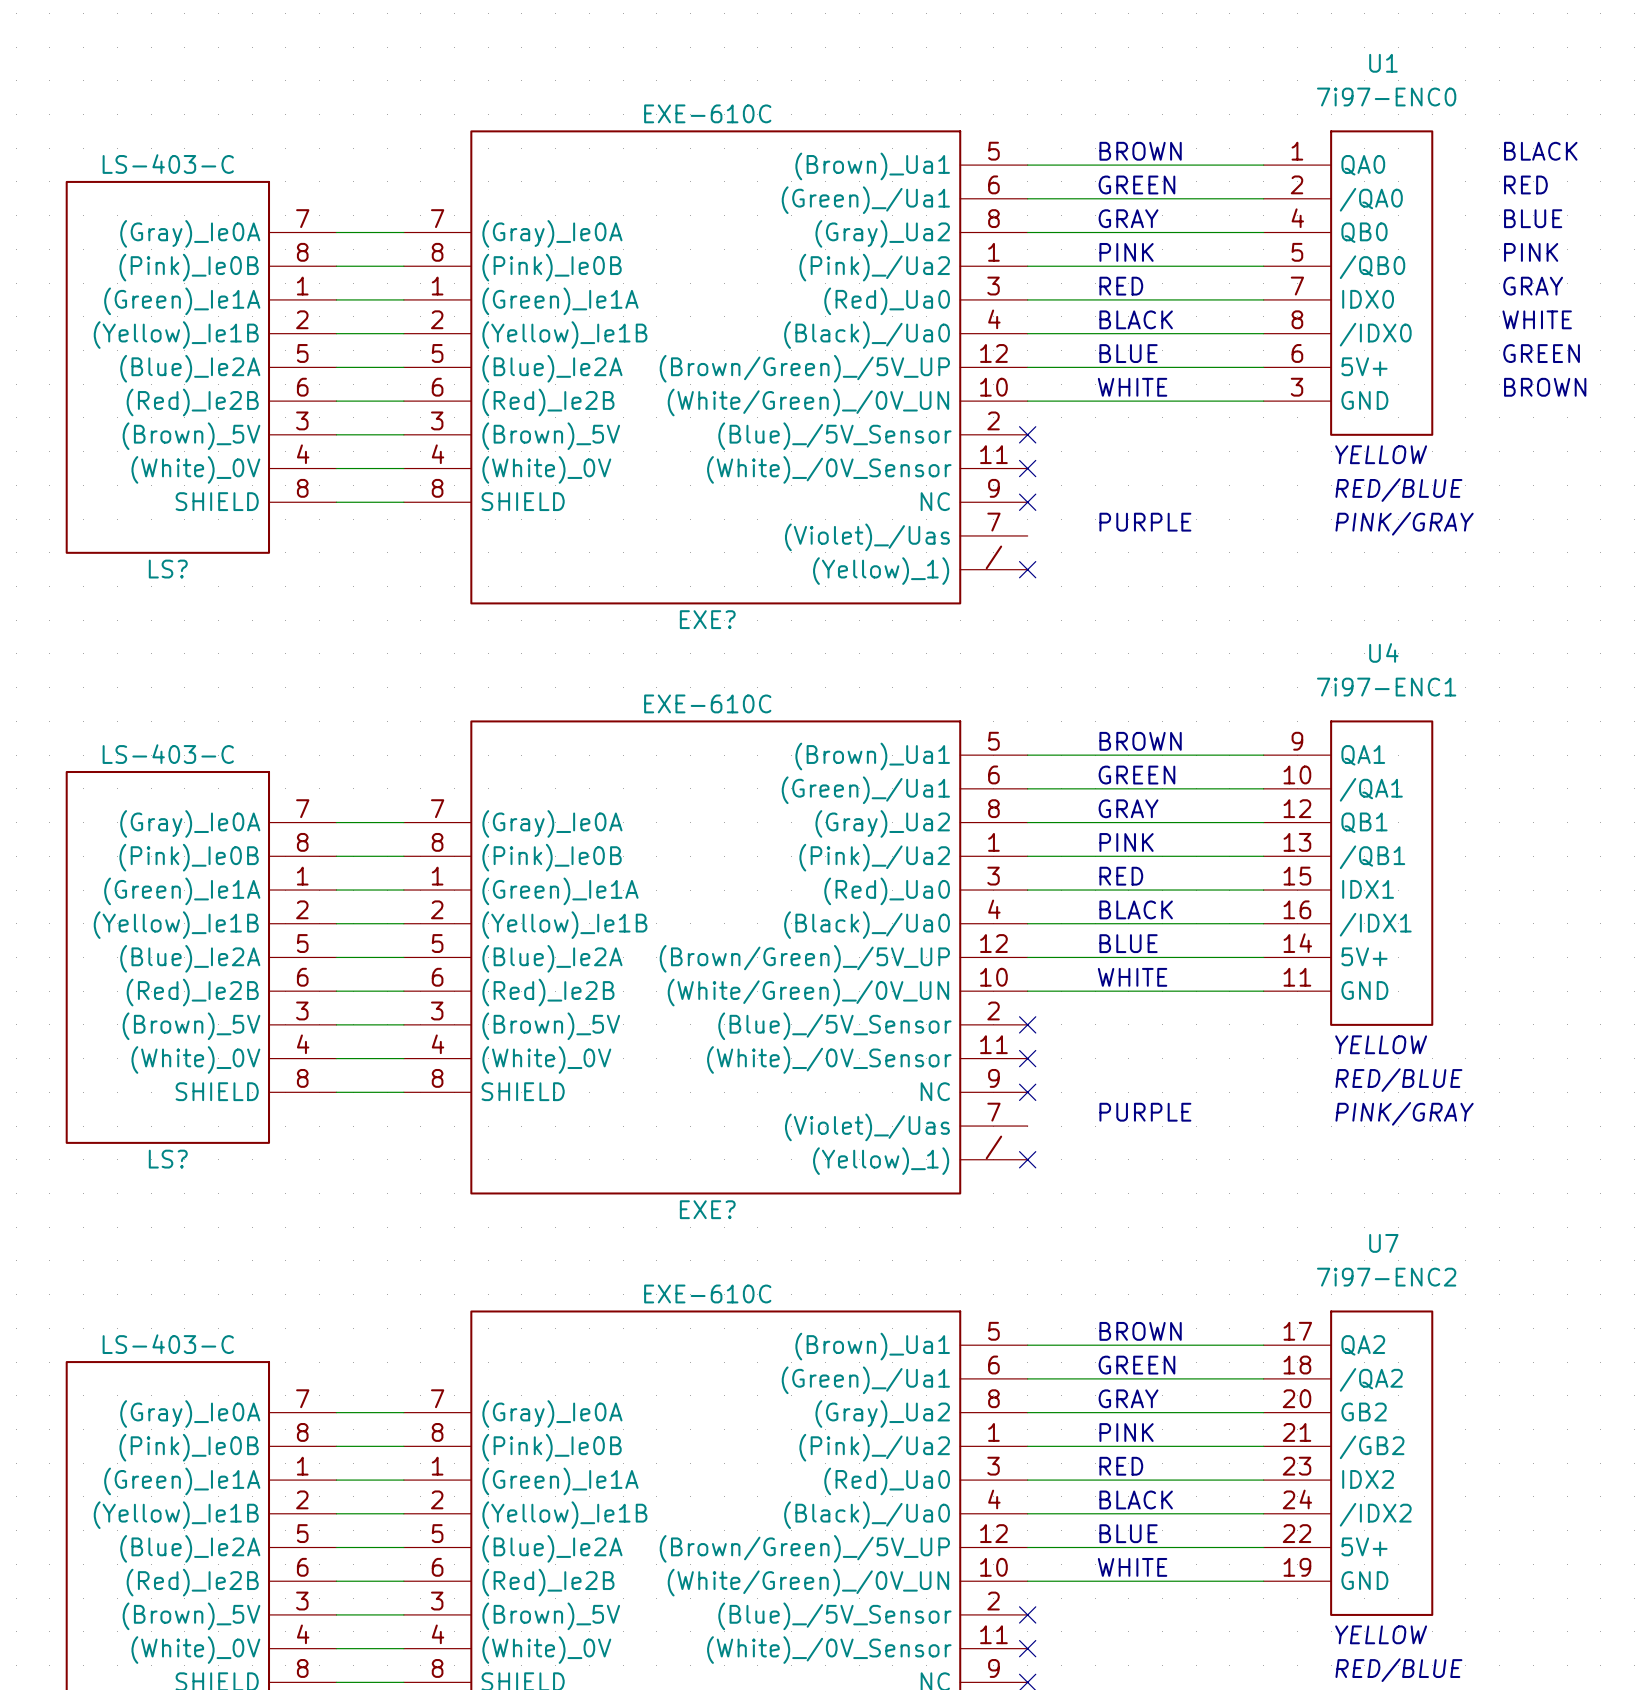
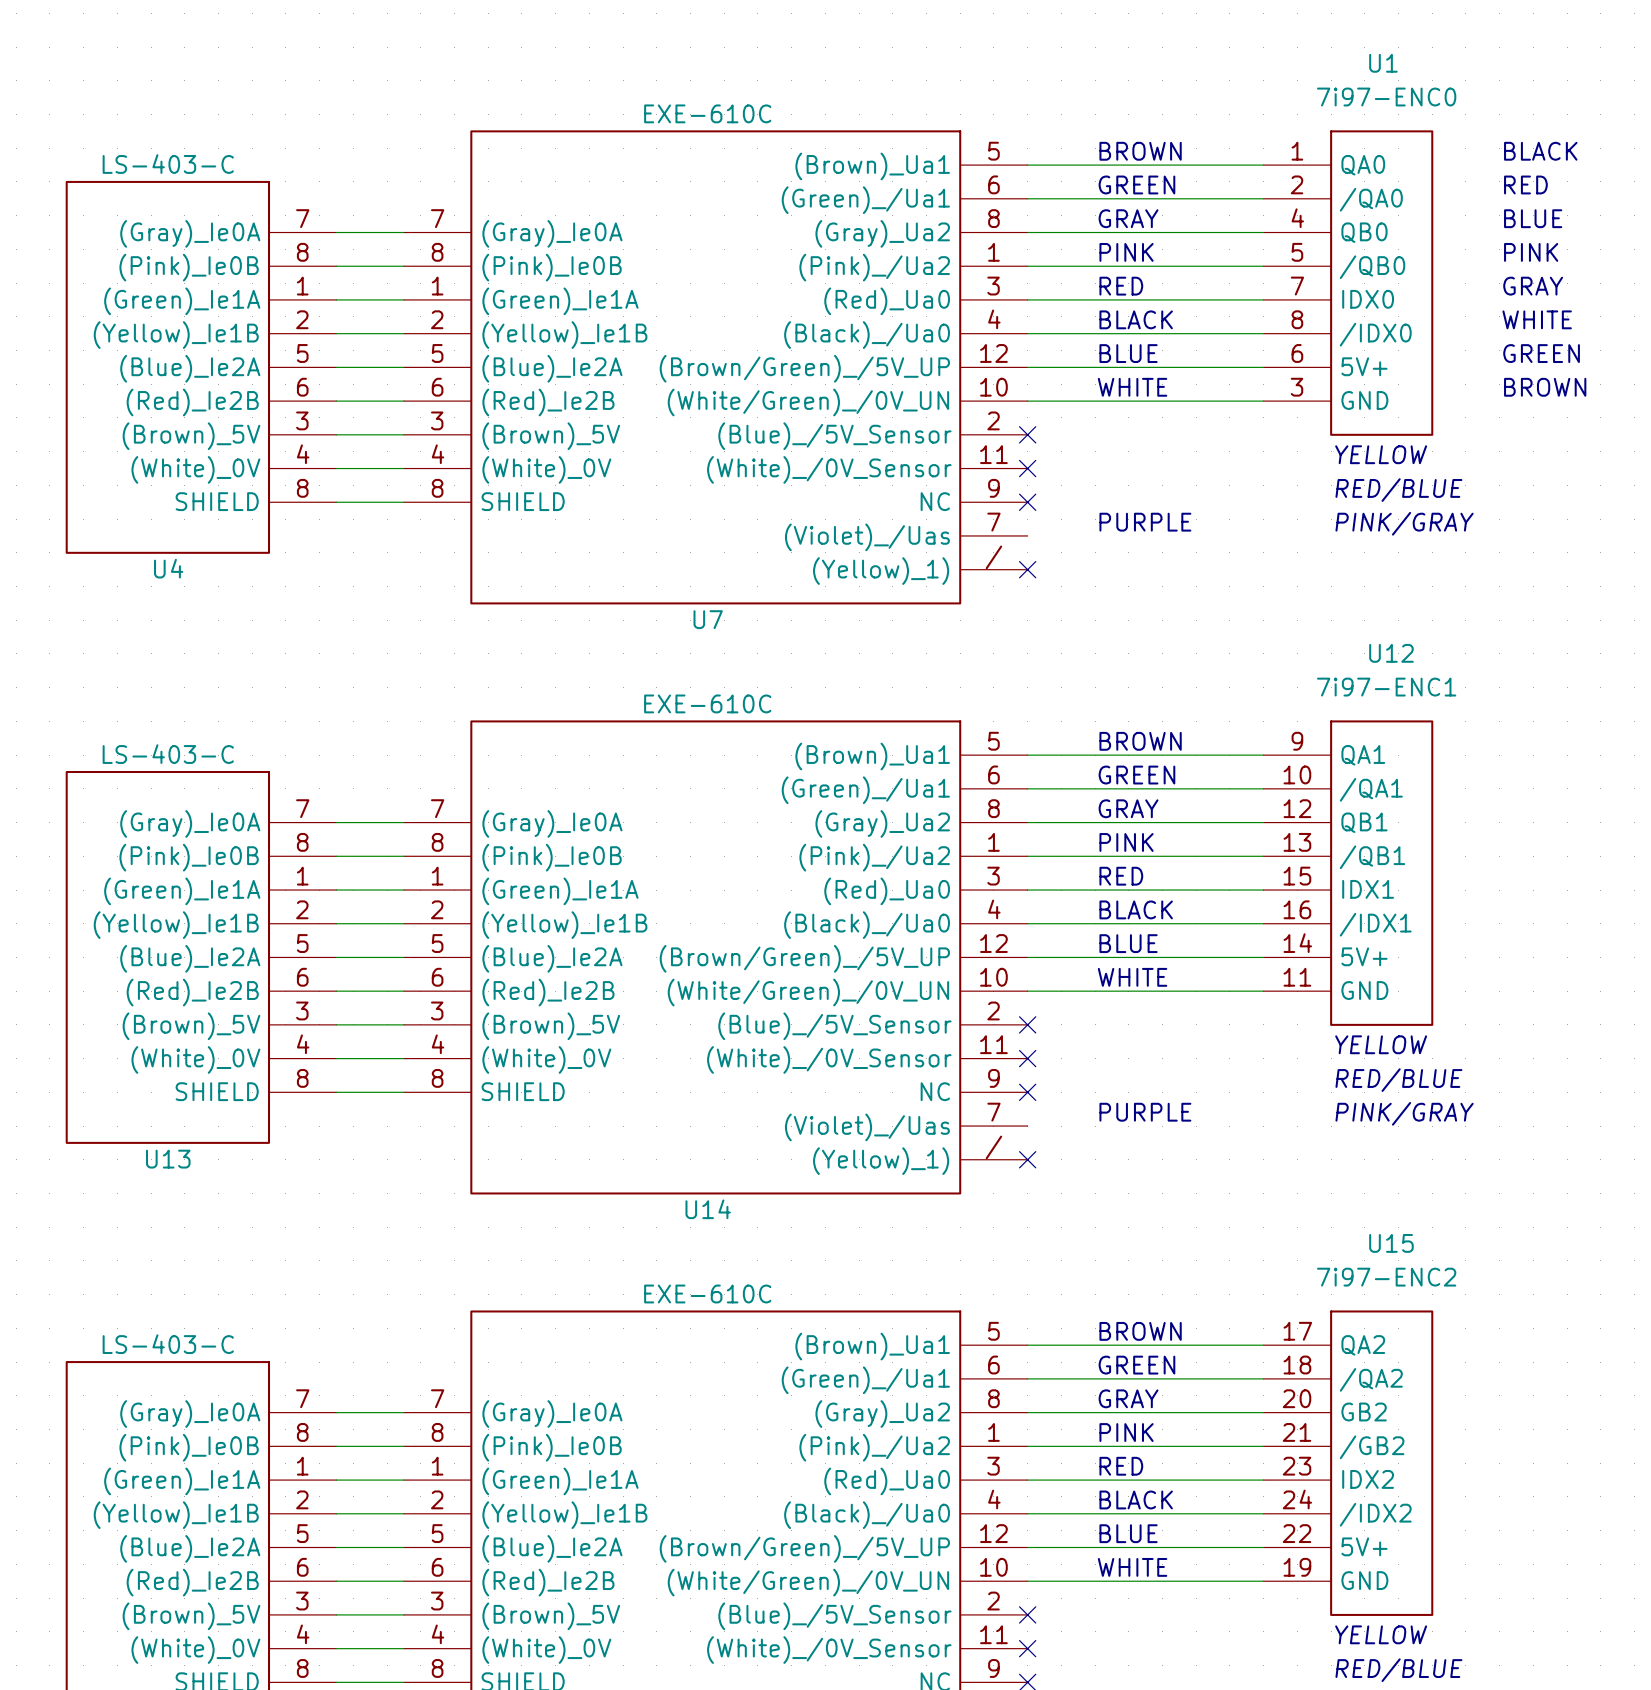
LS? name: LS? (168, 569) -> U4 (168, 568)
EXE? name: EXE? (707, 619) -> U7 (708, 619)
U4 name: U4 (1383, 652) -> U12 (1391, 653)
LS? name: LS? (168, 1159) -> U13 (168, 1159)
EXE? name: EXE? (707, 1209) -> U14 (708, 1209)
U7 name: U7 (1383, 1243) -> U15 (1391, 1243)

